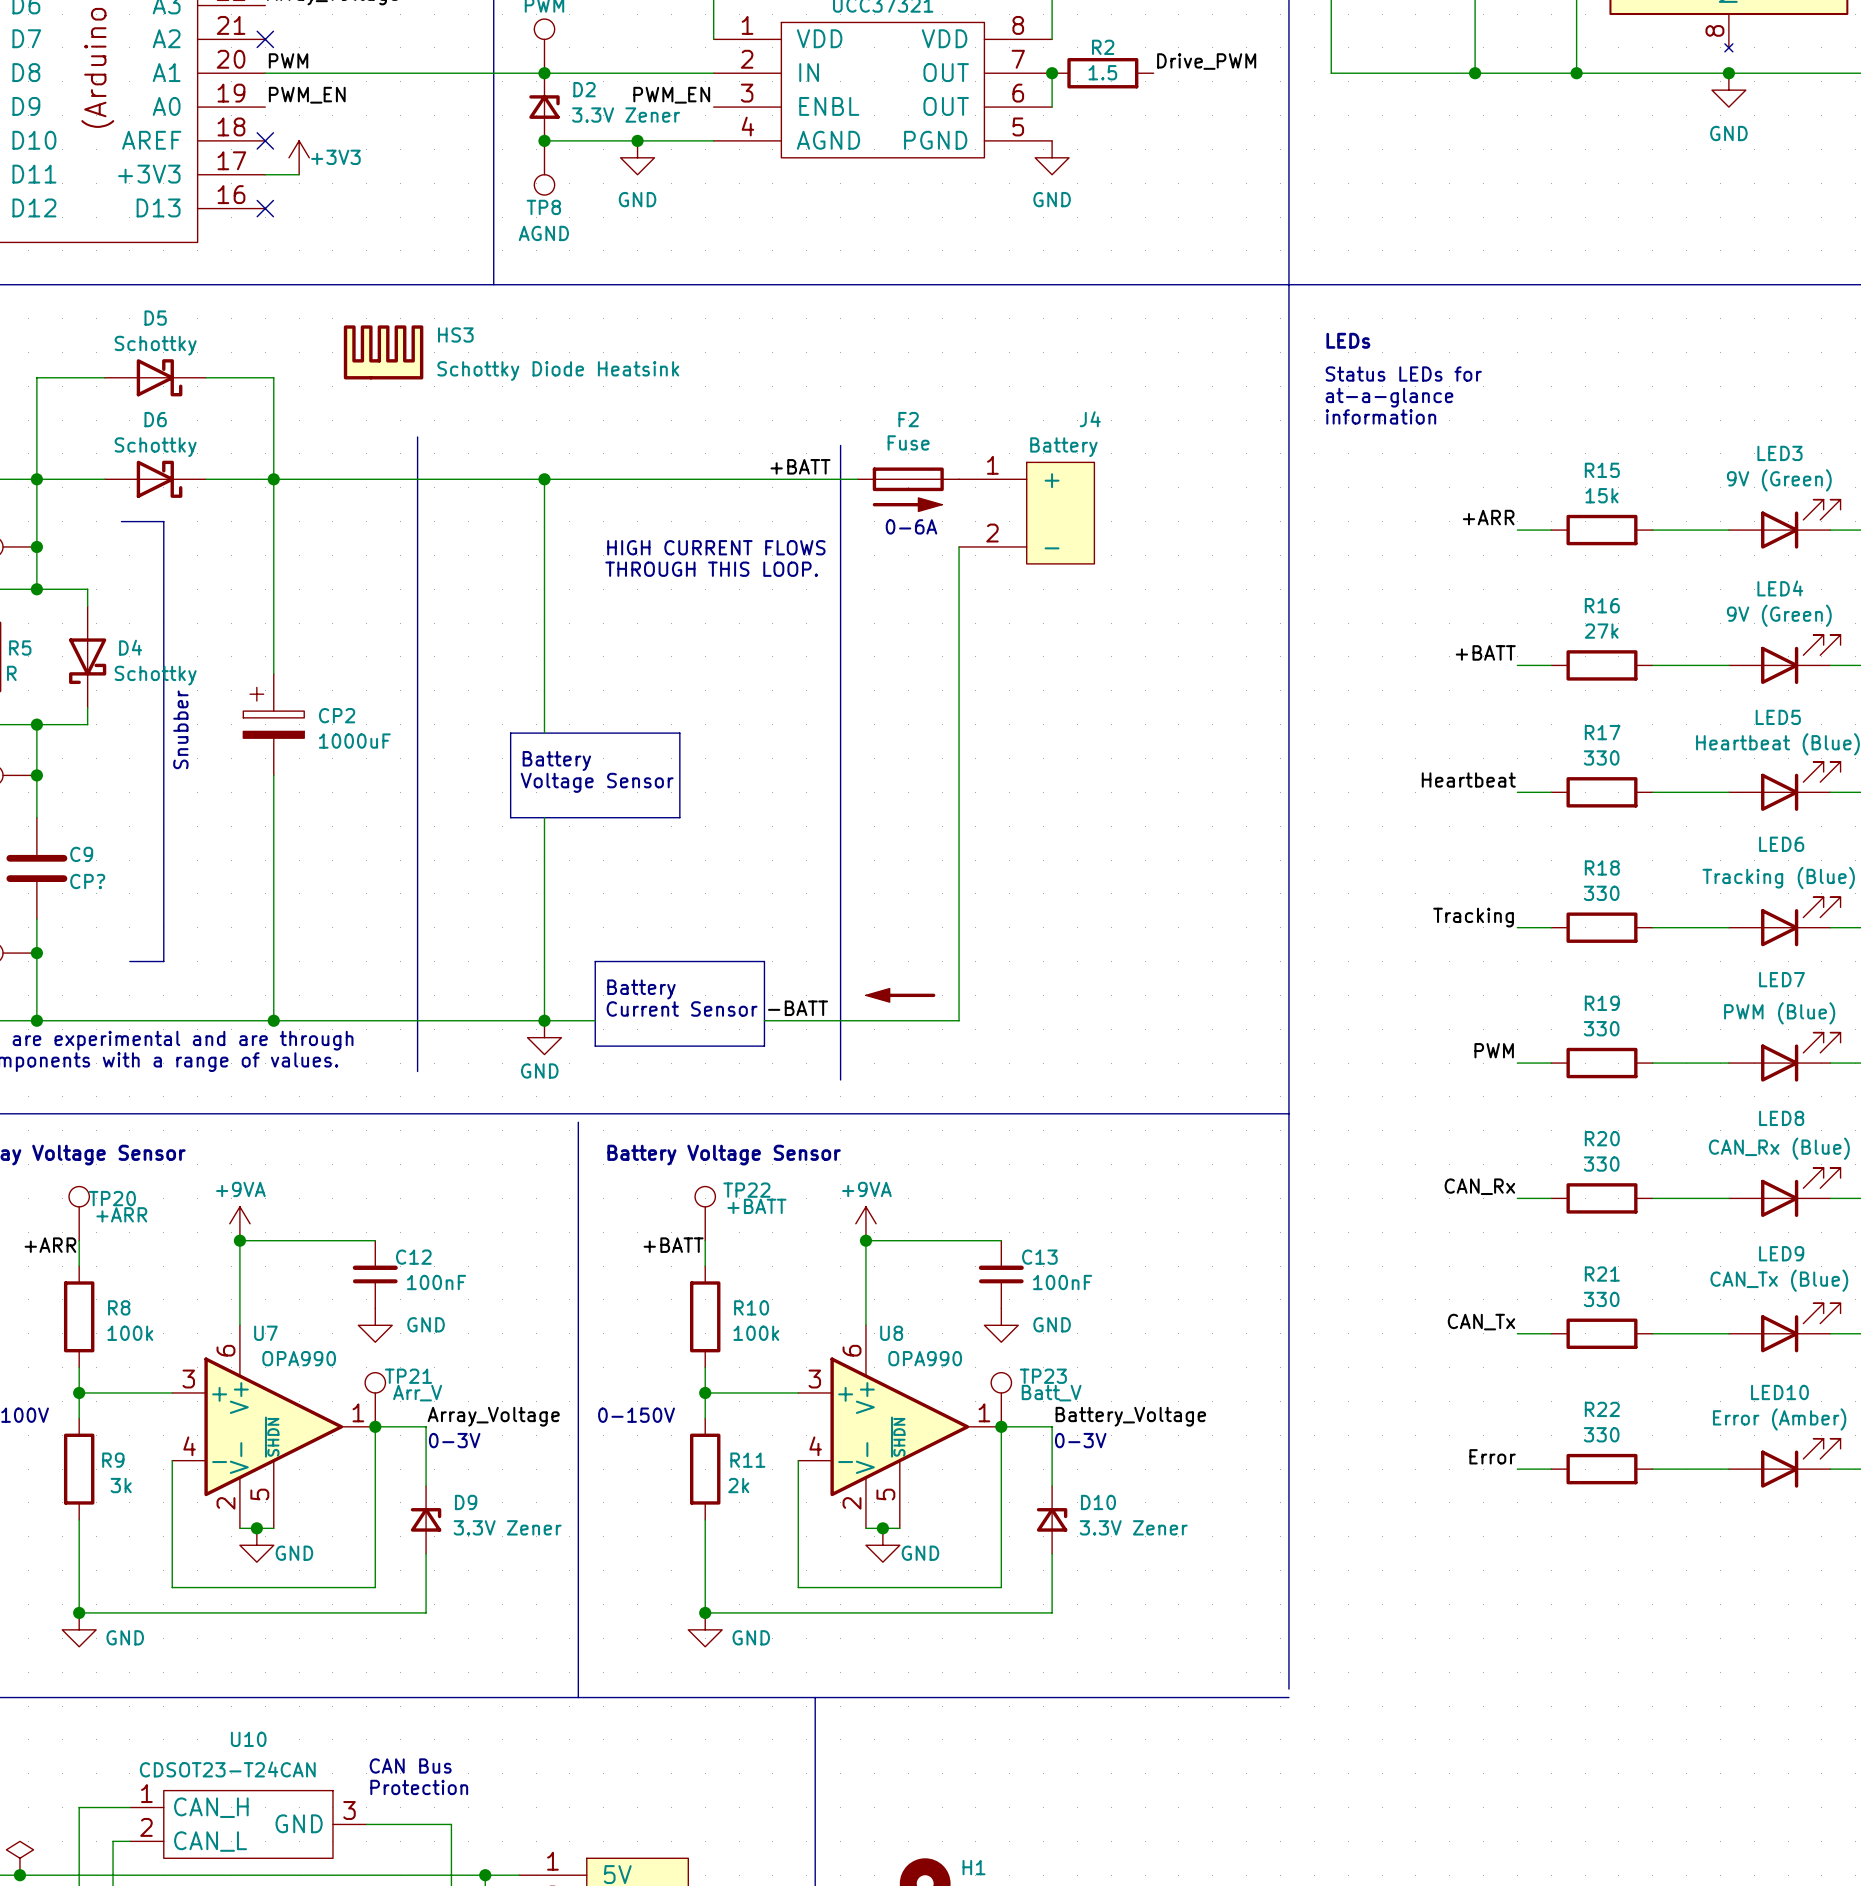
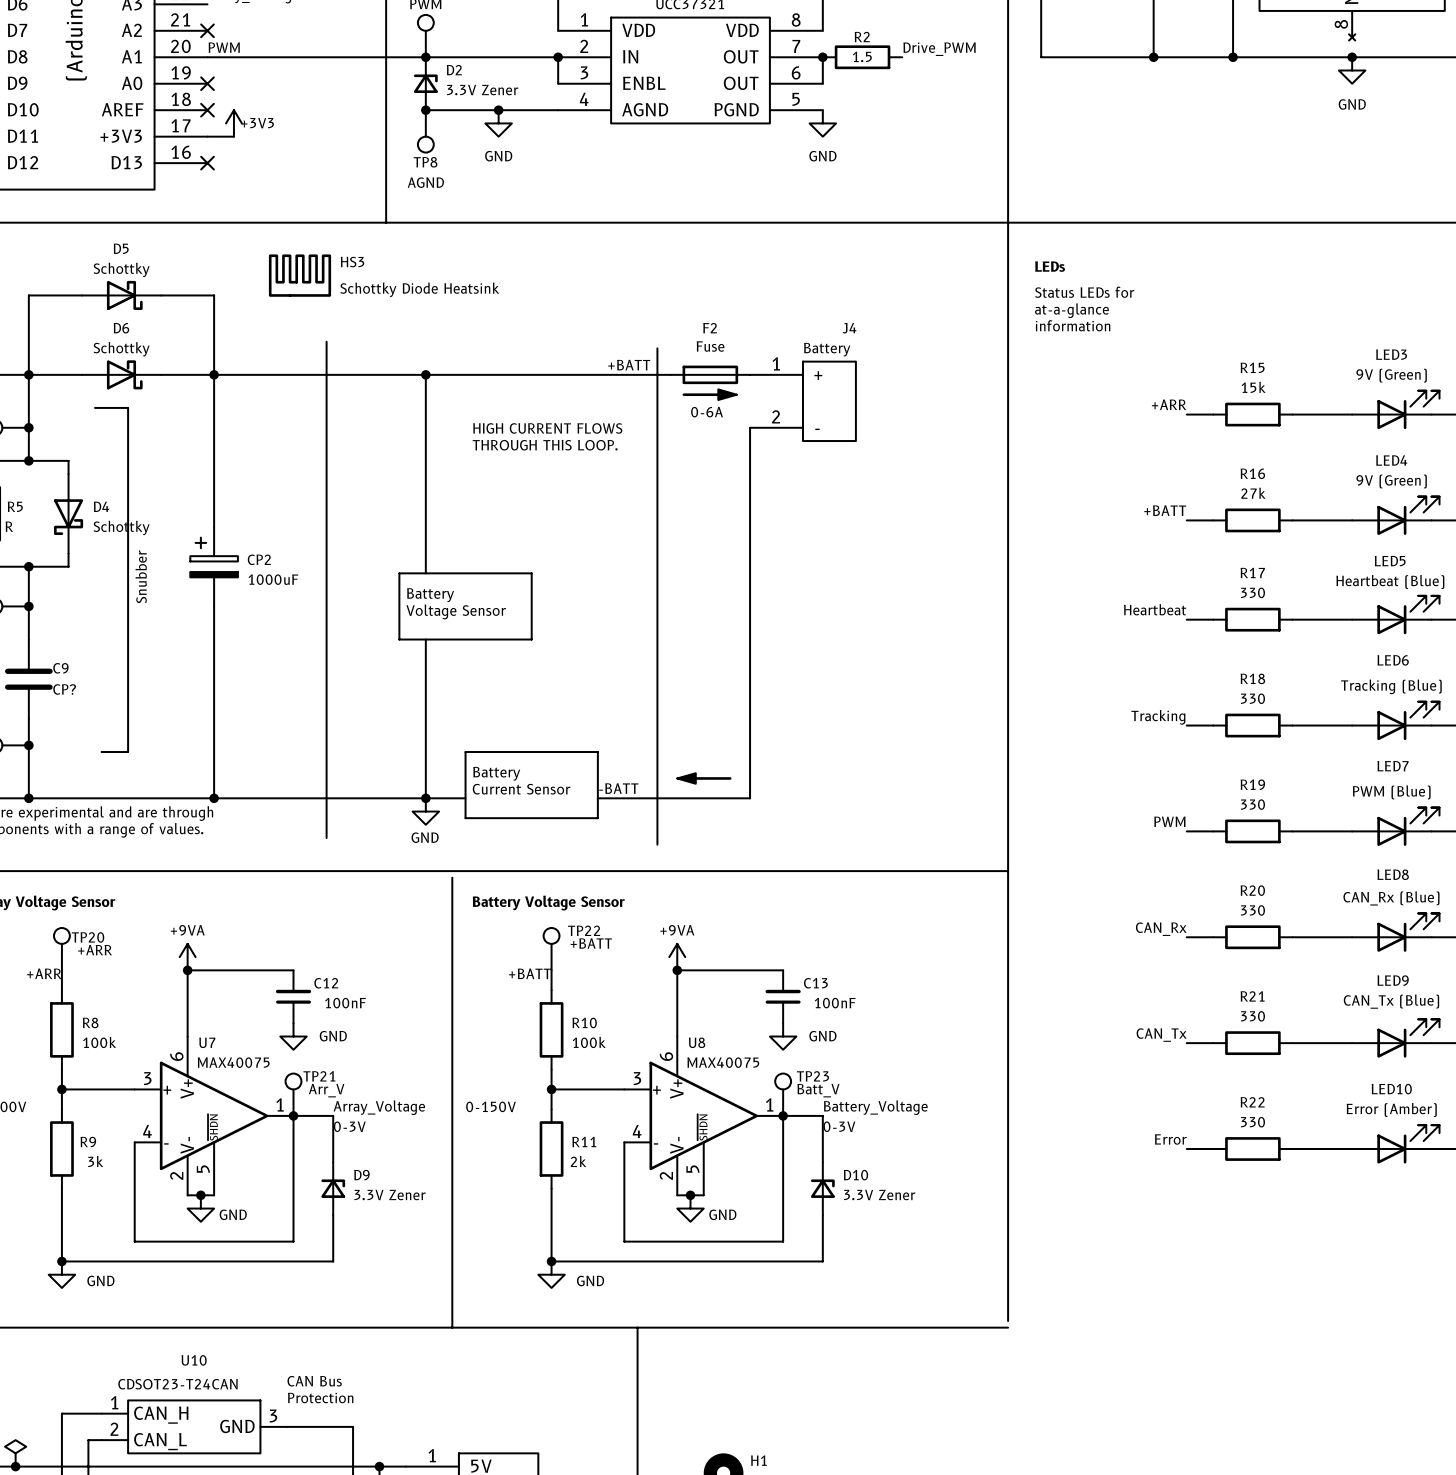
wire: none -> (558, 57) (558, 83)
junction: none -> (558, 57)
label: PWM_EN (307, 95) -> none
label: PWM_EN (671, 95) -> none
no-connect mark: none -> (207, 83)
U7 value: OPA990 (299, 1358) -> MAX40075 (233, 1062)
U8 value: OPA990 (925, 1358) -> MAX40075 (723, 1062)

